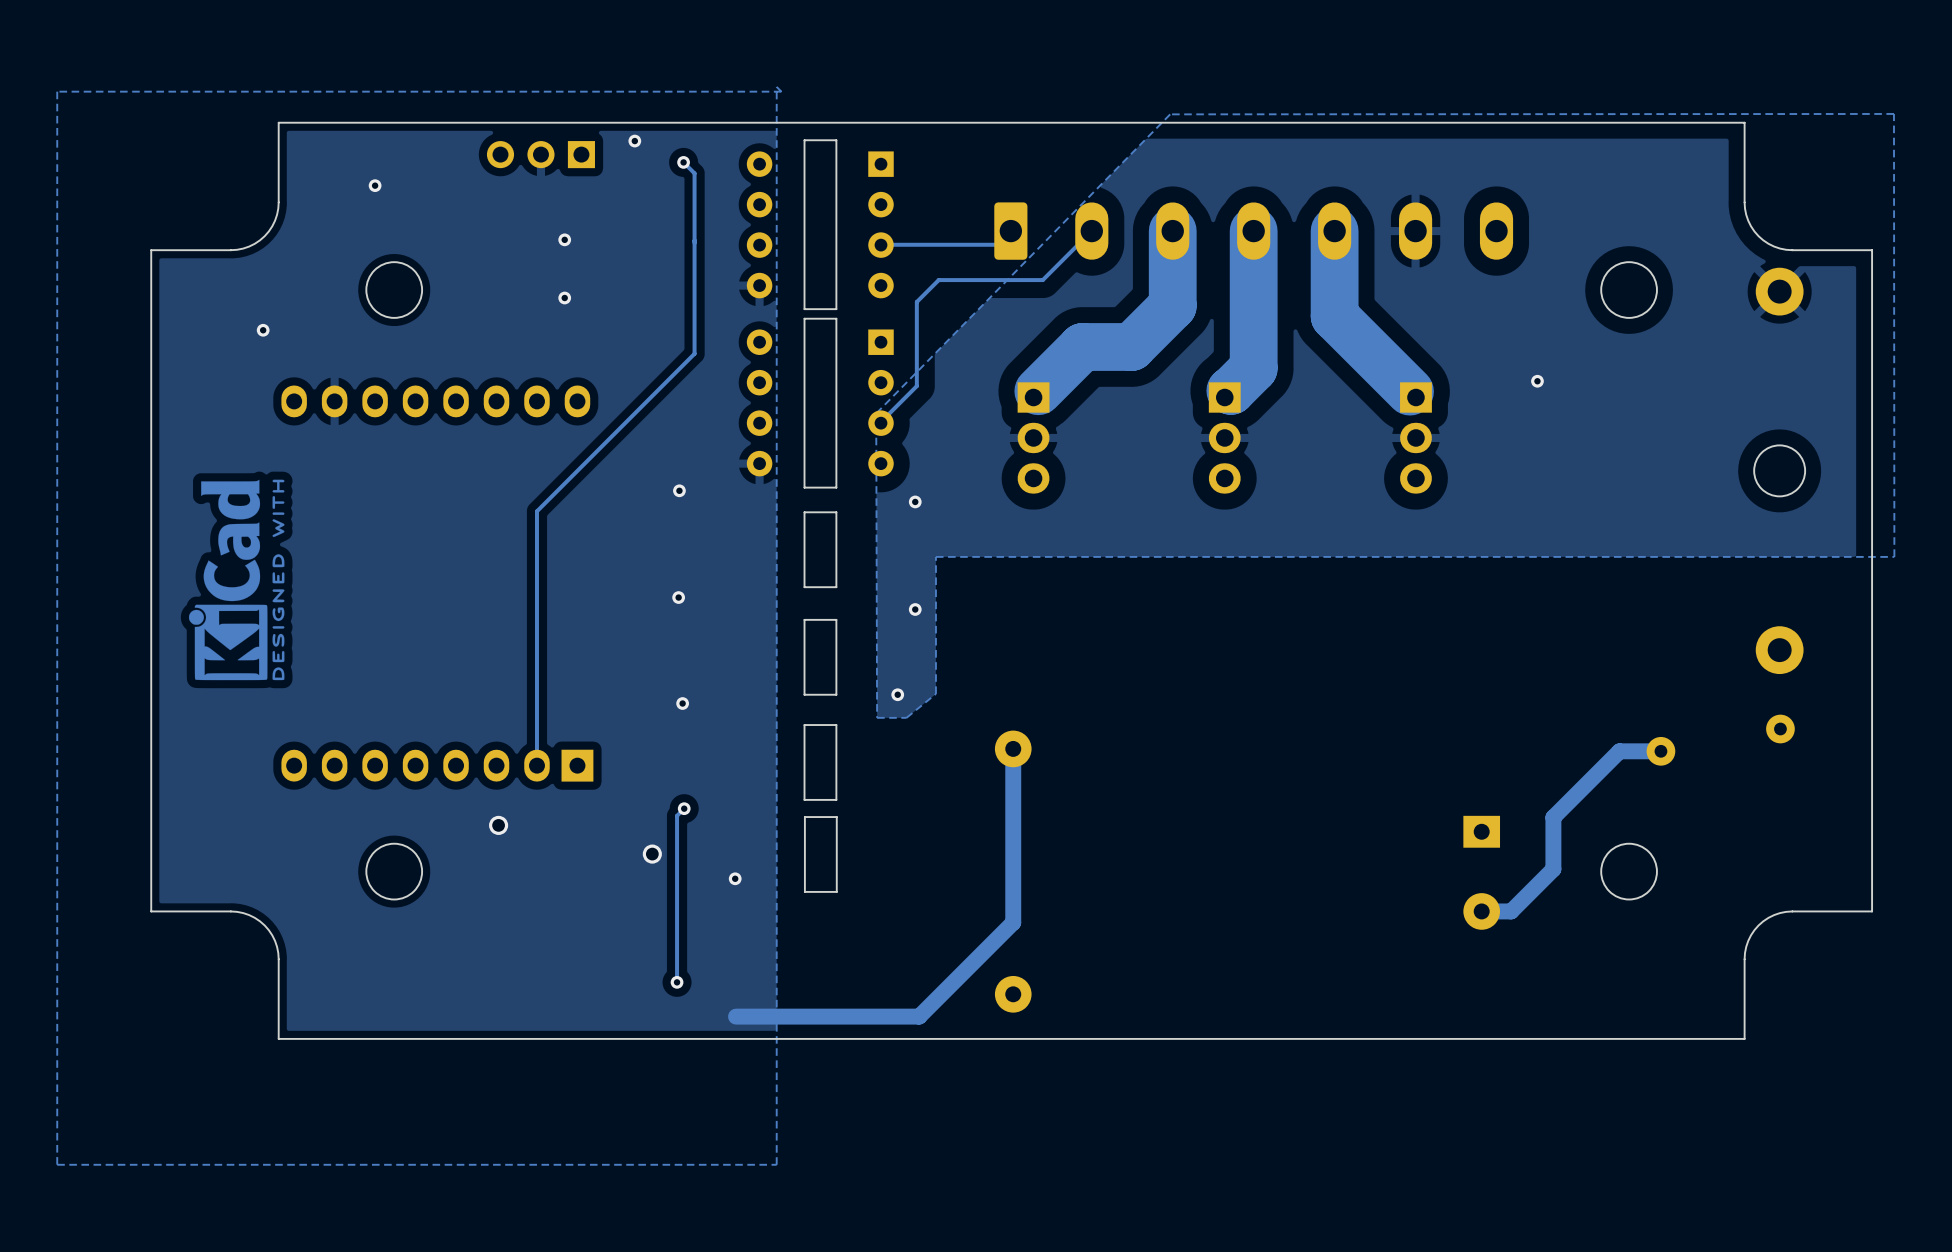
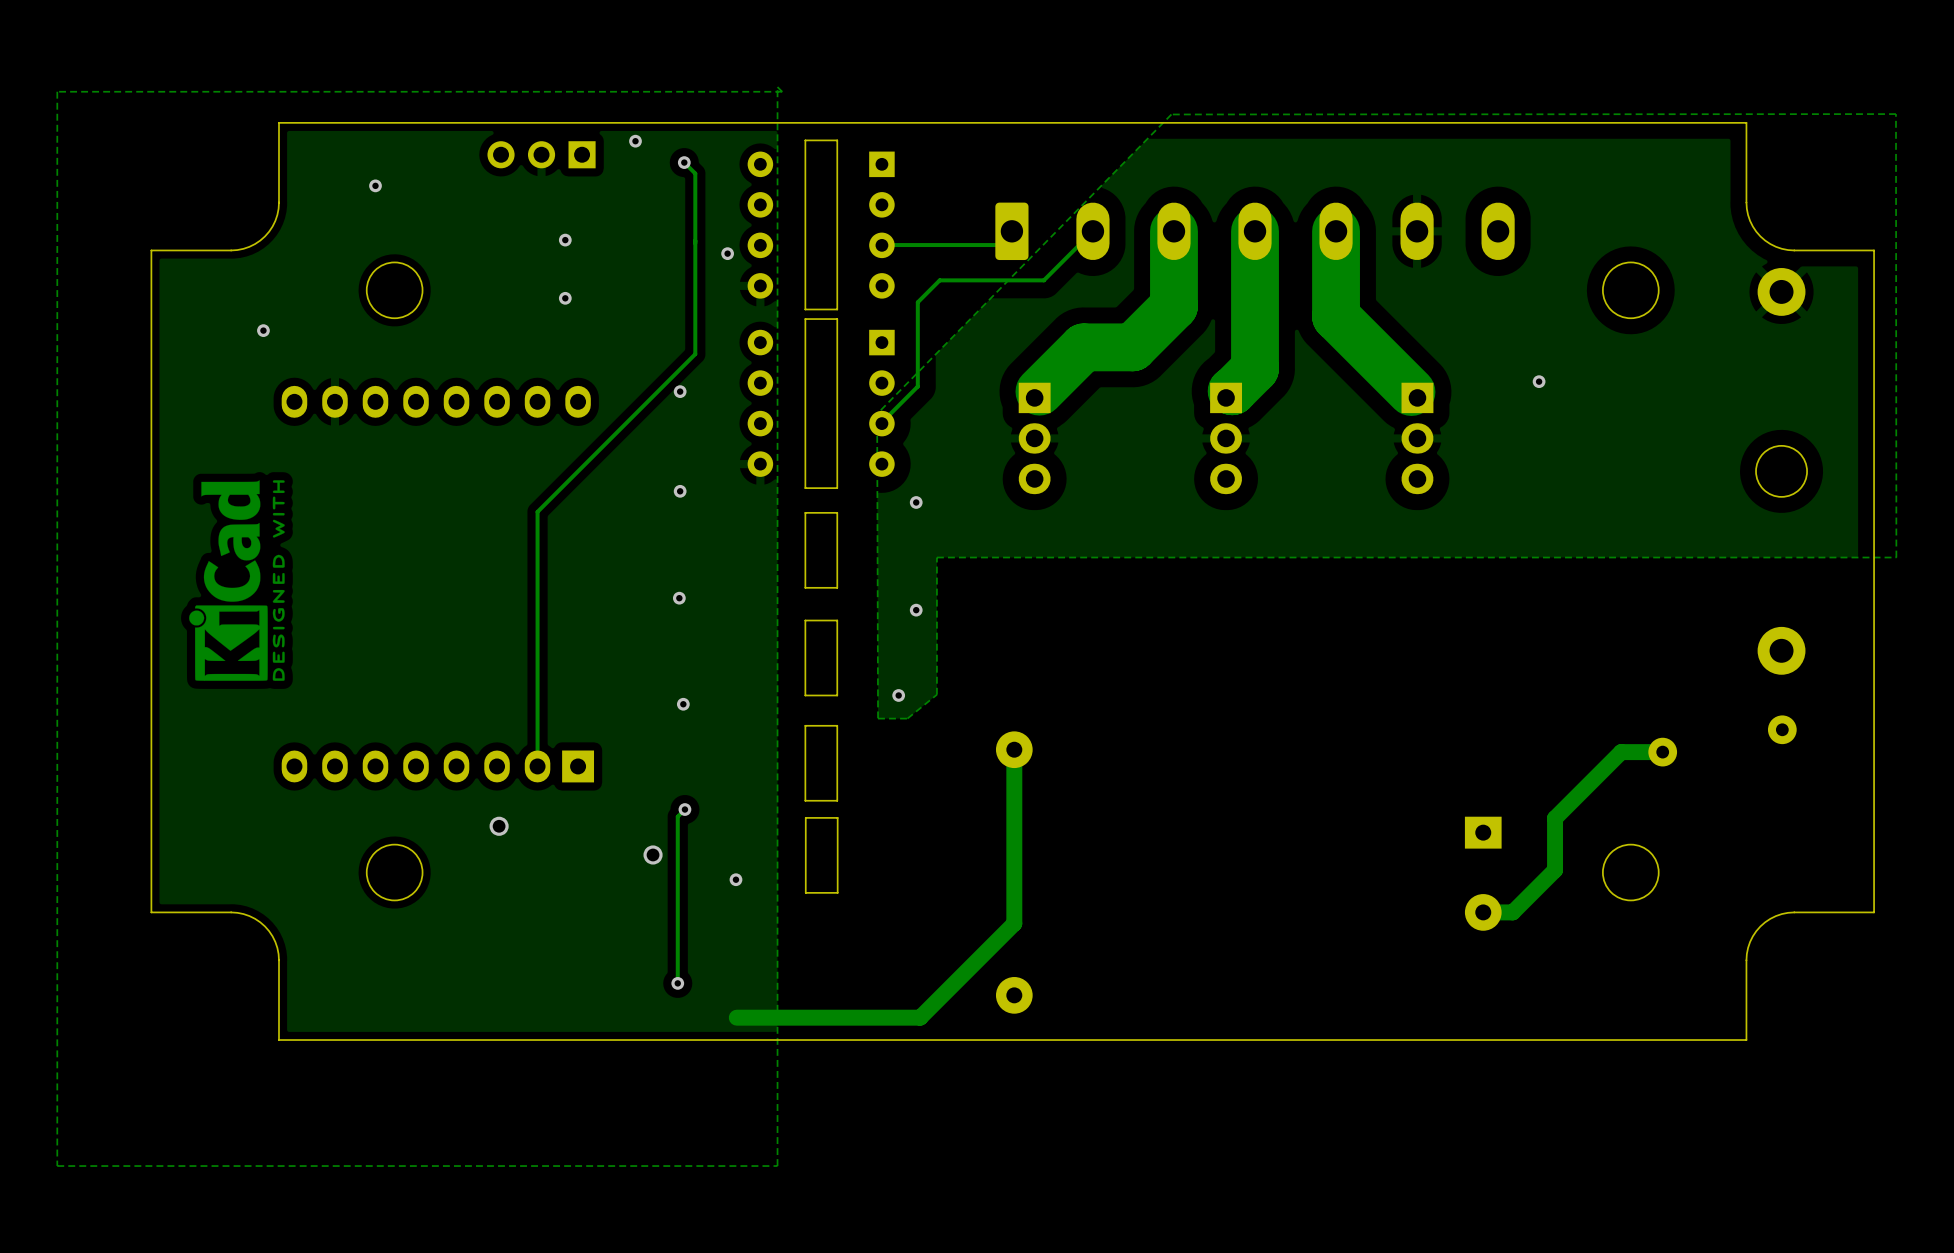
via: none -> (727, 253)
via: none -> (680, 391)

